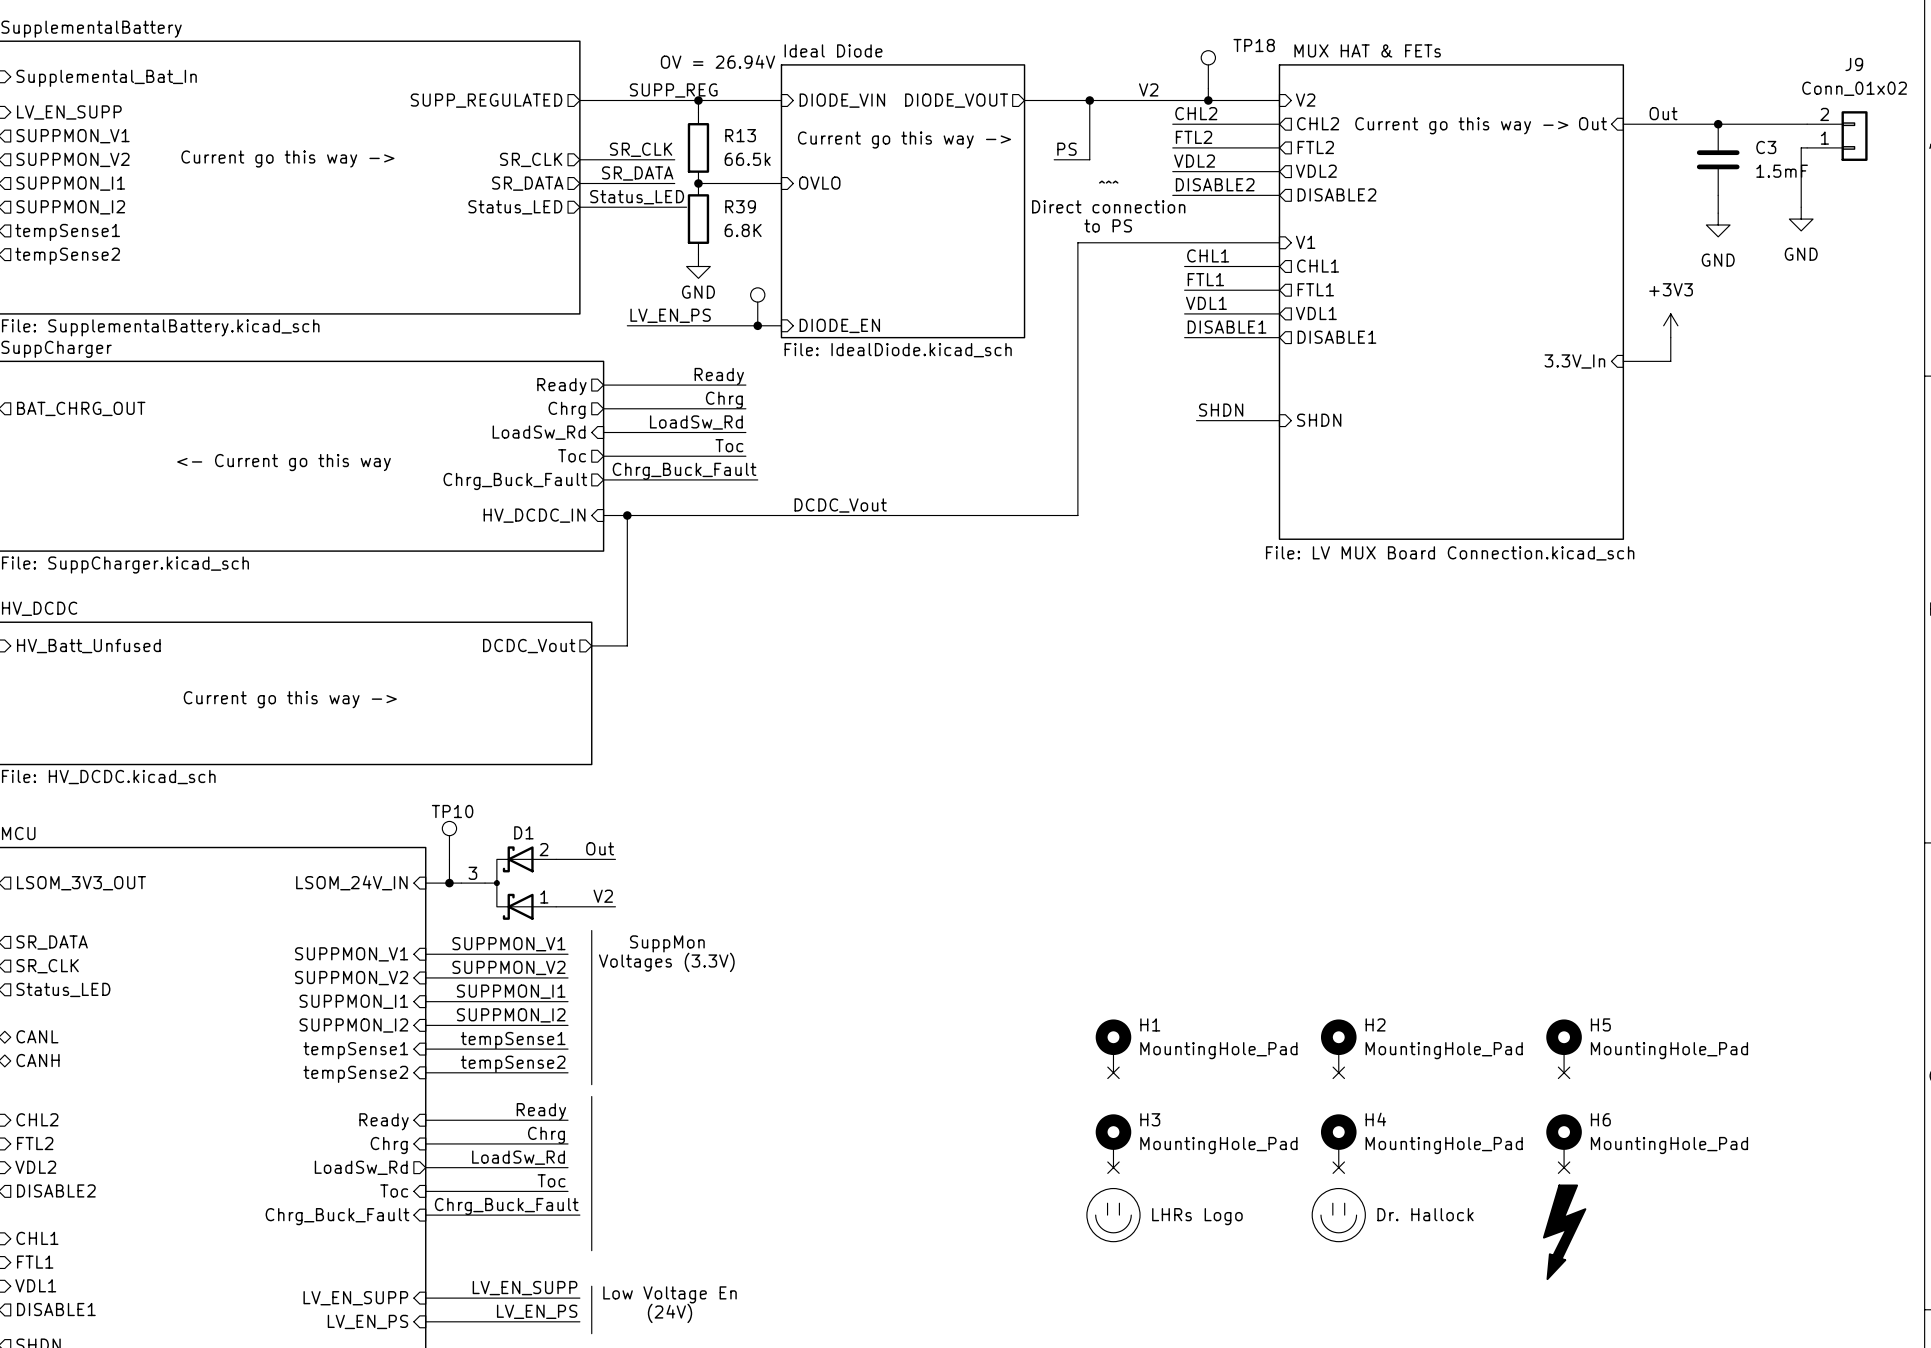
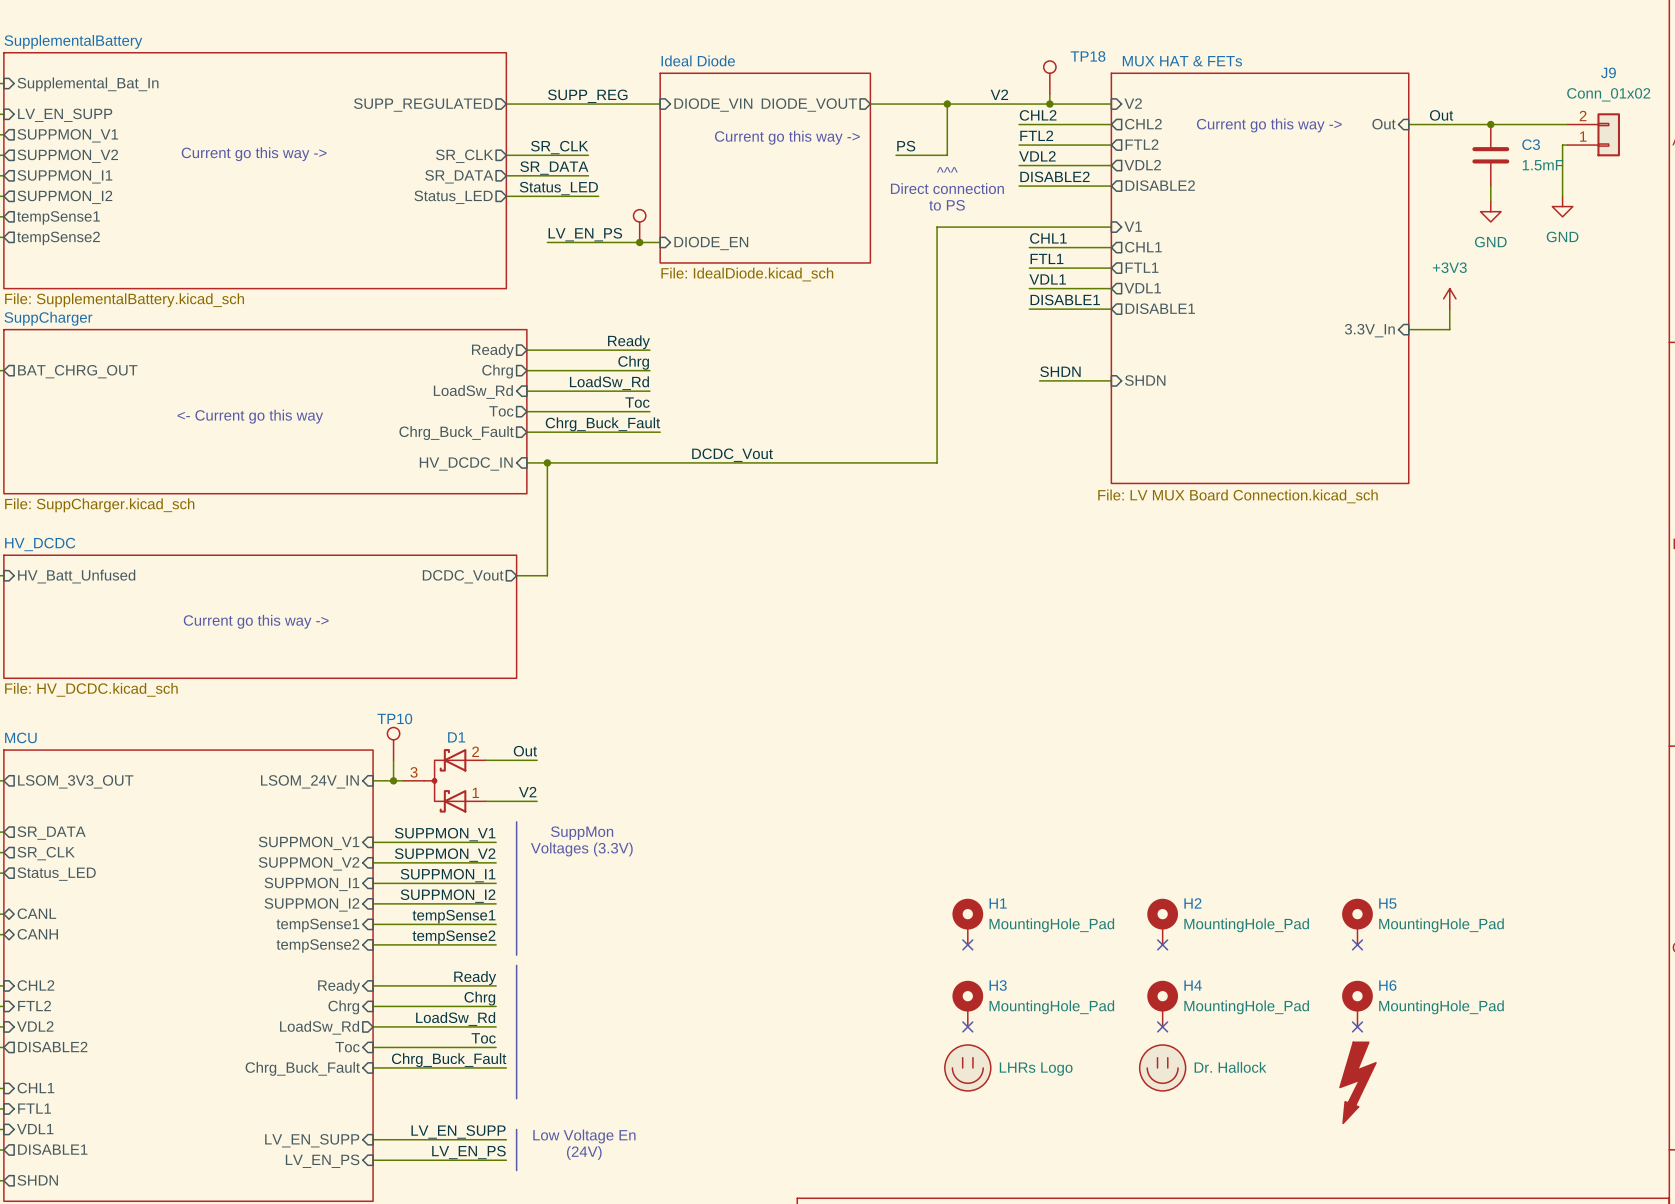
text: OV = 26.94V (718, 61) -> none
wire: (698, 100) (698, 112) -> none
junction: (698, 100) -> none
wire: (757, 100) (781, 100) -> none
sheet pin position: DIODE_VIN (842, 100) -> DIODE_VIN (713, 105)
sheet pin position: DIODE_VOUT (956, 100) -> DIODE_VOUT (809, 105)
wire: none -> (870, 104) (890, 104)
R13: 66.5k (698, 147) -> none
label position: PS (1066, 149) -> PS (906, 146)
wire: none -> (896, 155) (916, 155)
sheet Ideal Diode: none -> File: IdealDiode.kicad_sch (765, 168)
text position: ^^^ (1108, 182) -> ^^^ (947, 169)
wire: (698, 183) (781, 183) -> none
junction: (698, 183) -> none
sheet pin: OVLO (819, 183) -> none
sheet Ideal Diode: File: IdealDiode.kicad_sch (903, 201) -> none
text position: Direct connection (1108, 206) -> Direct connection (947, 188)
R39: 6.8K (698, 219) -> none
text position: to PS (1108, 225) -> to PS (947, 205)
wire: none -> (547, 242) (660, 242)
junction: none -> (639, 242)
power symbol: GND (698, 266) -> none
part position: (757, 306) -> (639, 226)
label position: LV_EN_PS (670, 315) -> LV_EN_PS (585, 234)
wire: (627, 325) (781, 325) -> none
junction: (757, 325) -> none
sheet pin position: DIODE_EN (839, 325) -> DIODE_EN (711, 243)

